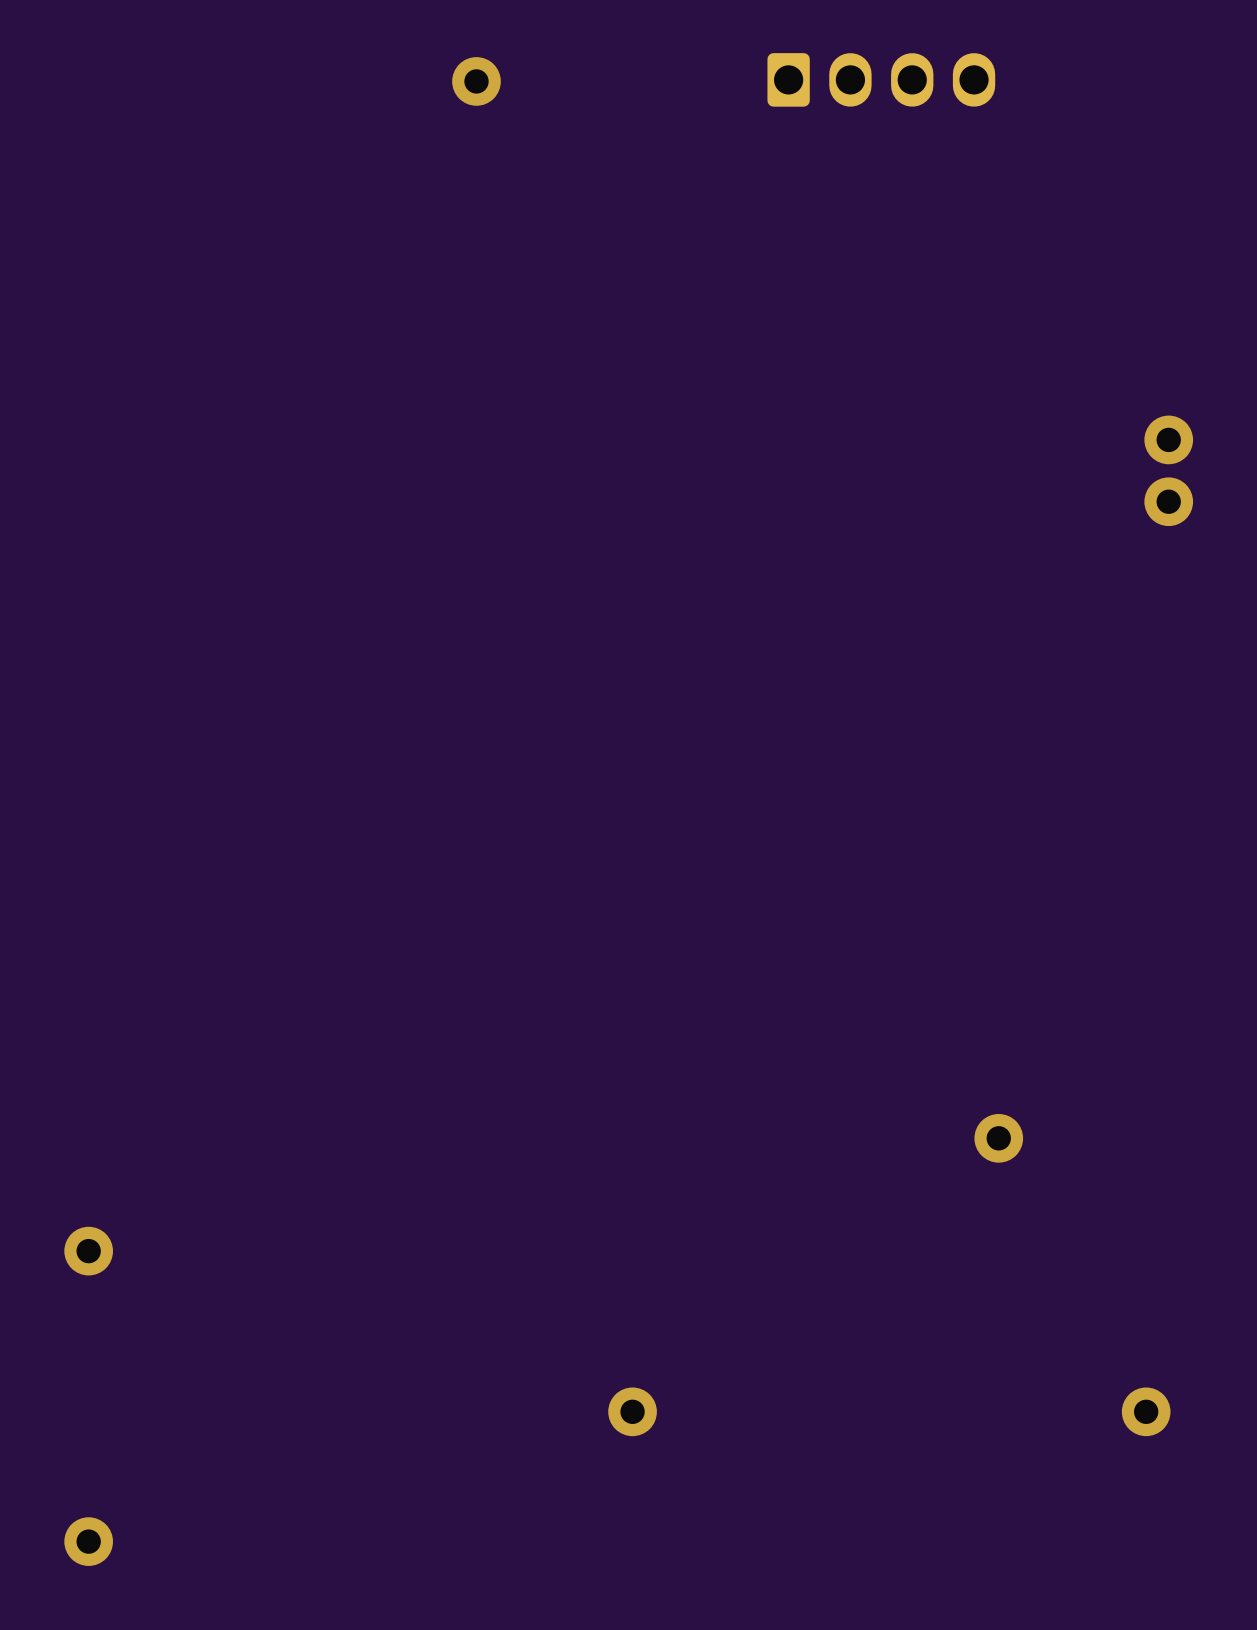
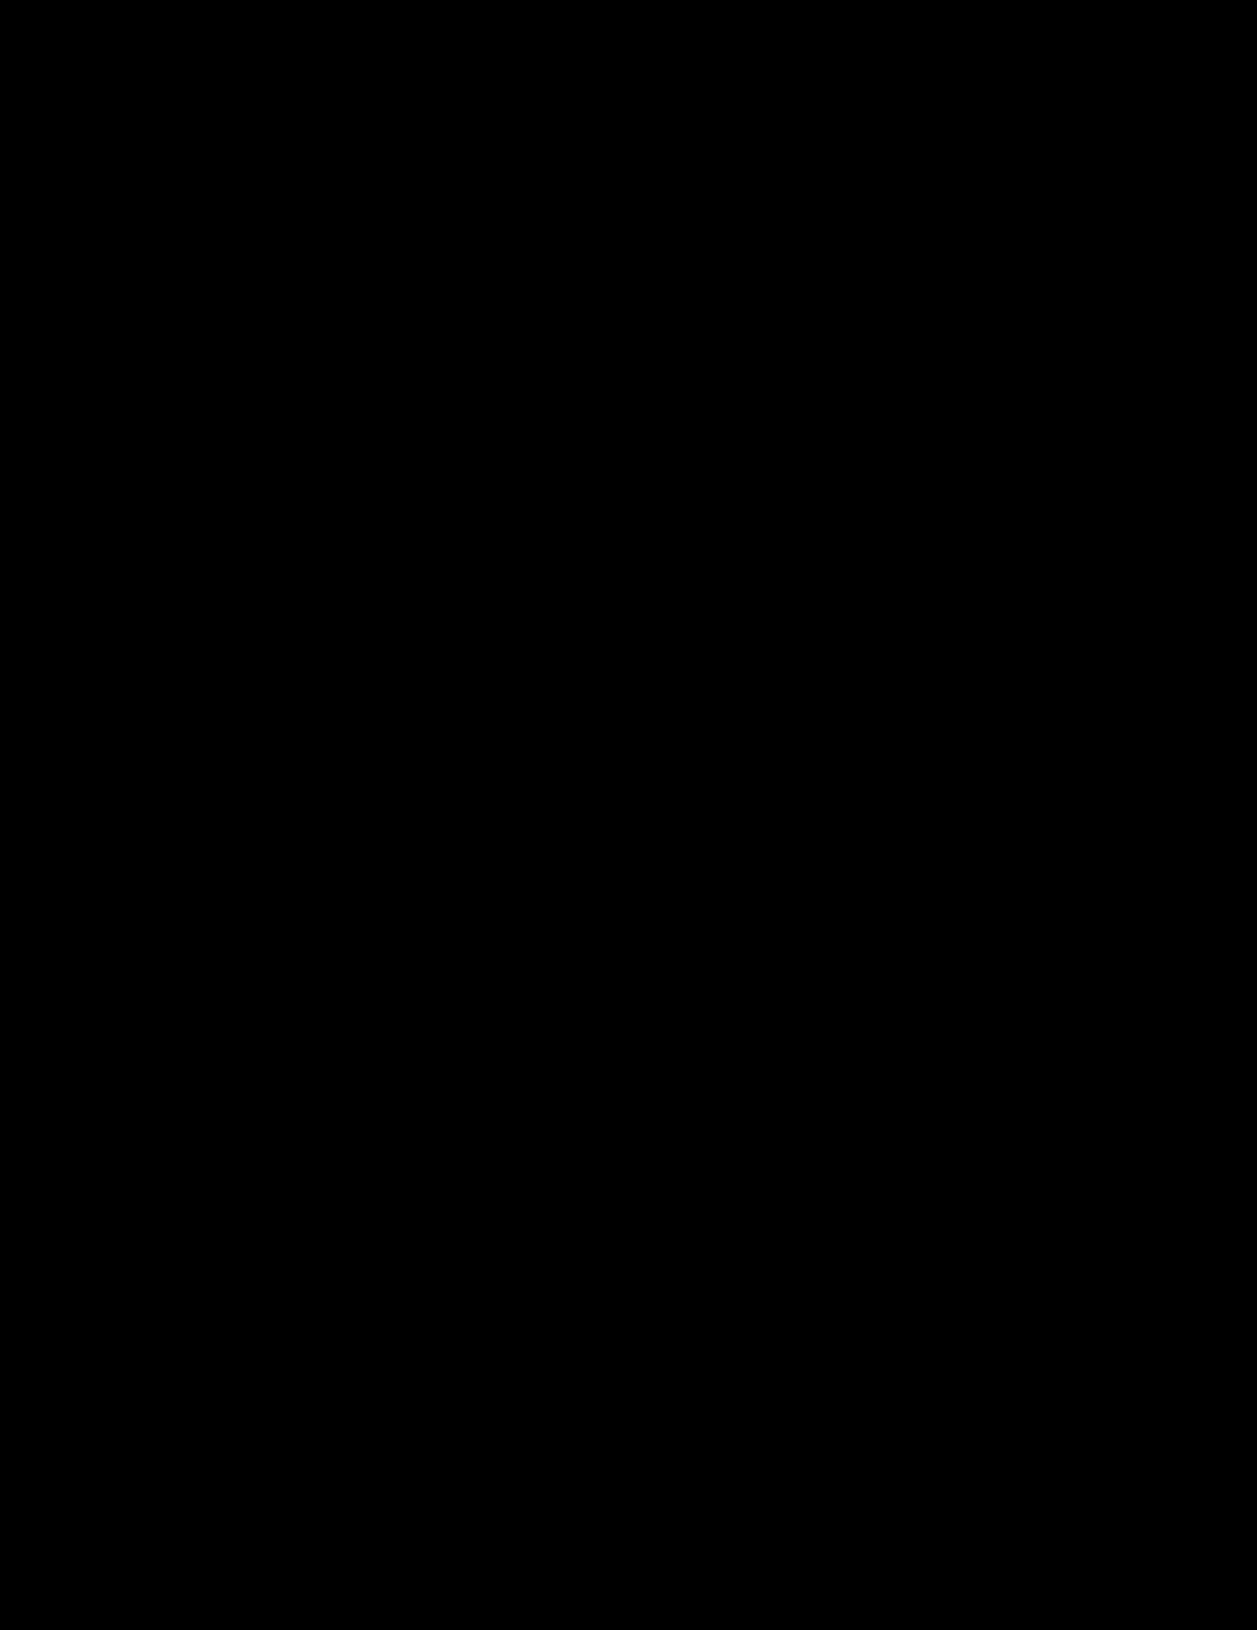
part: (881, 79) -> none
via: (476, 81) -> none
via: (1168, 439) -> none
via: (1168, 501) -> none
via: (998, 1138) -> none
via: (88, 1251) -> none
via: (632, 1411) -> none
via: (1146, 1411) -> none
via: (88, 1541) -> none

